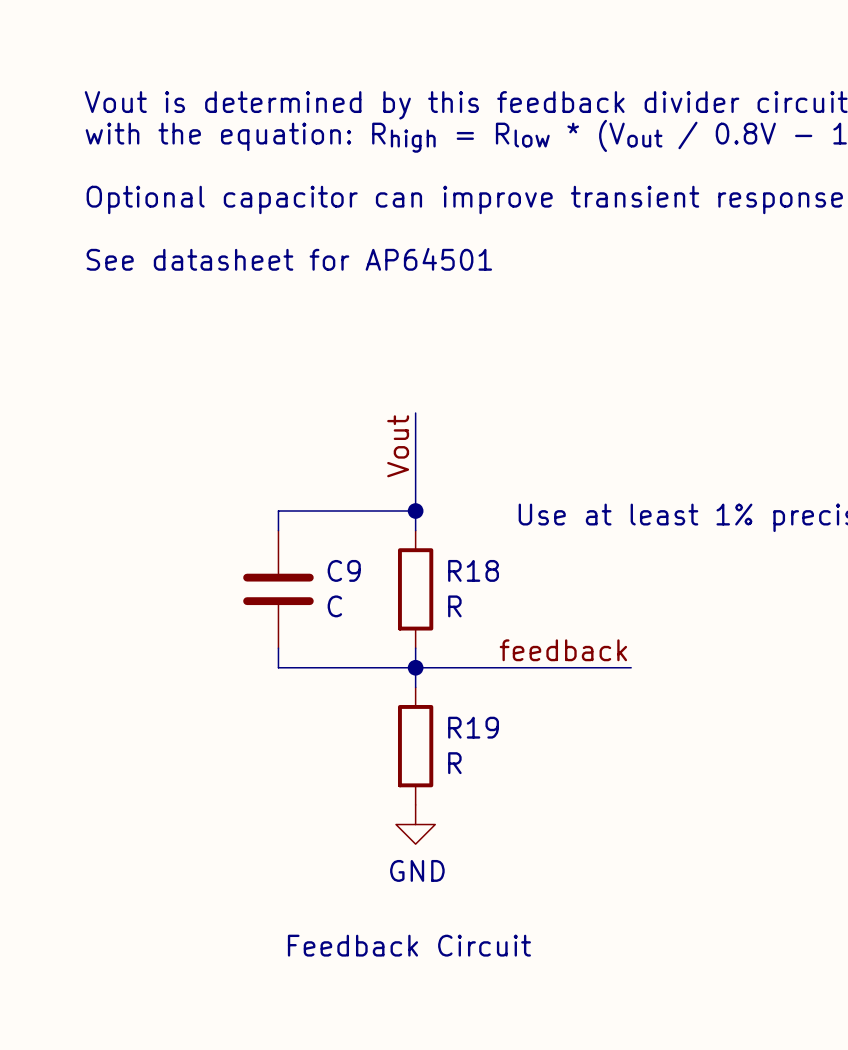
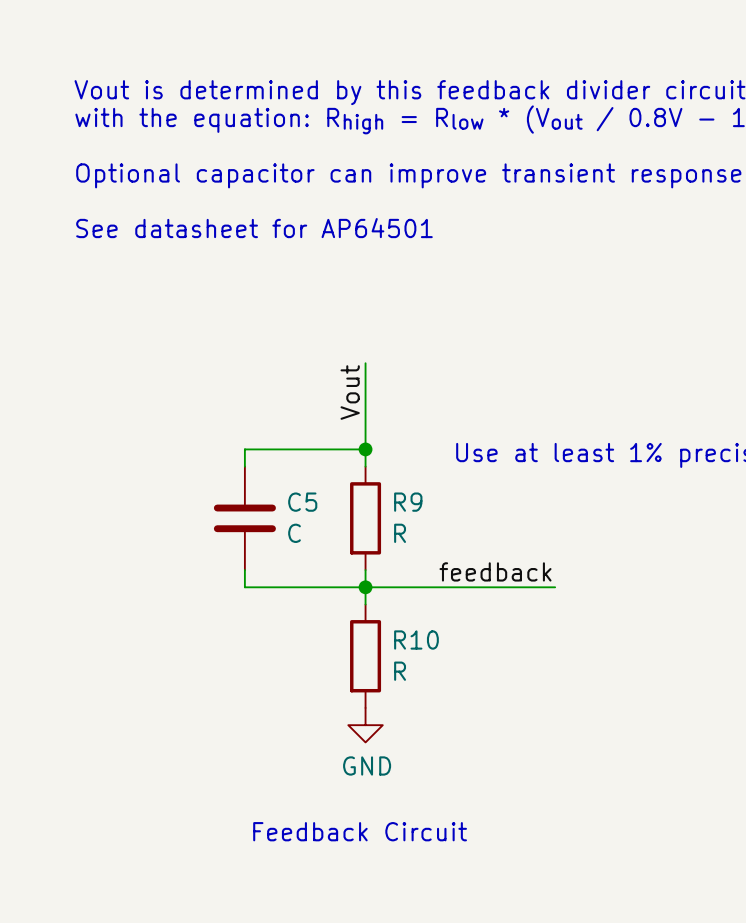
C9 name: C9 (344, 570) -> C5 (302, 502)
R18 name: R18 (473, 570) -> R9 (408, 502)
R19 name: R19 (473, 727) -> R10 (416, 640)

